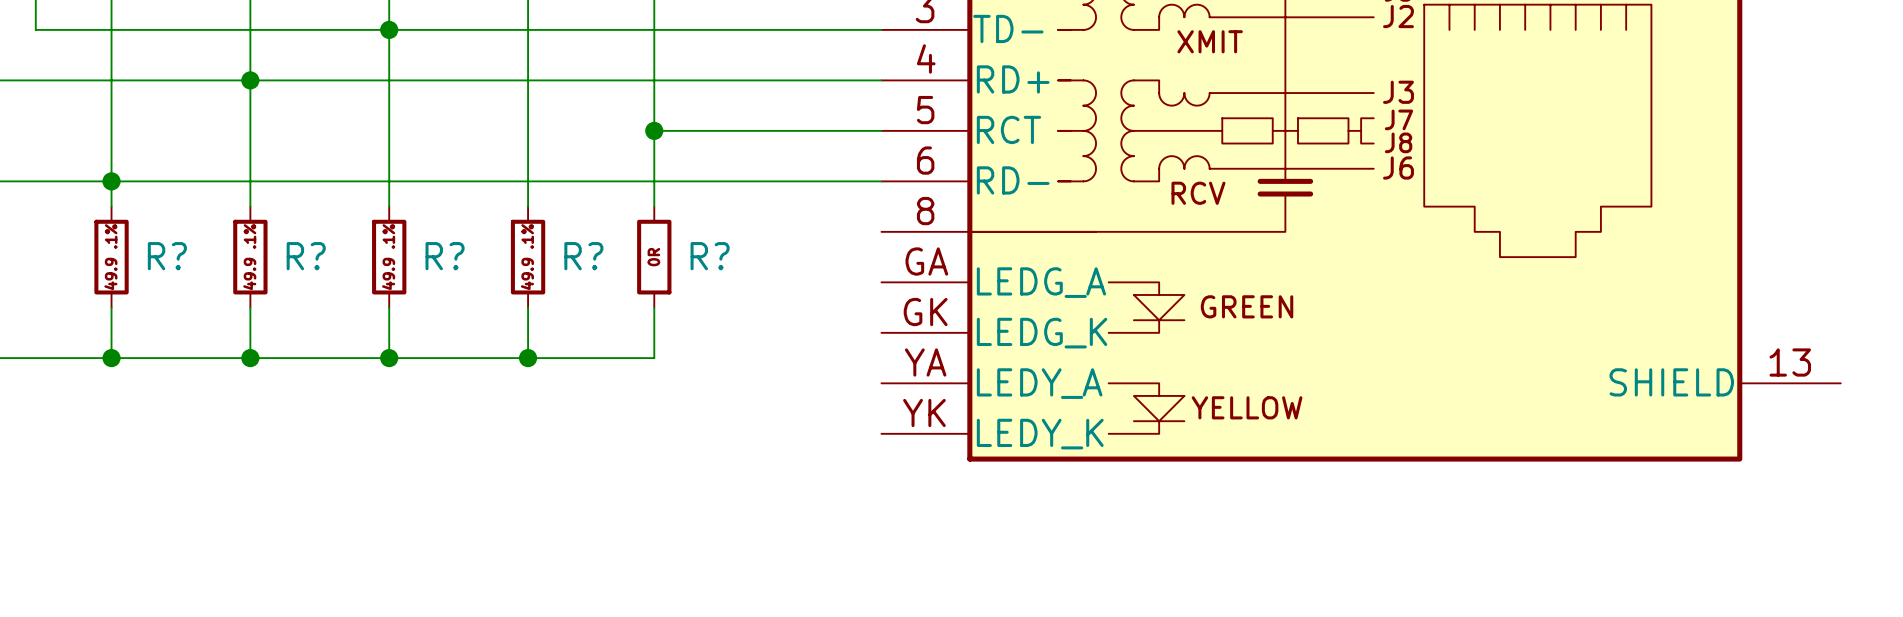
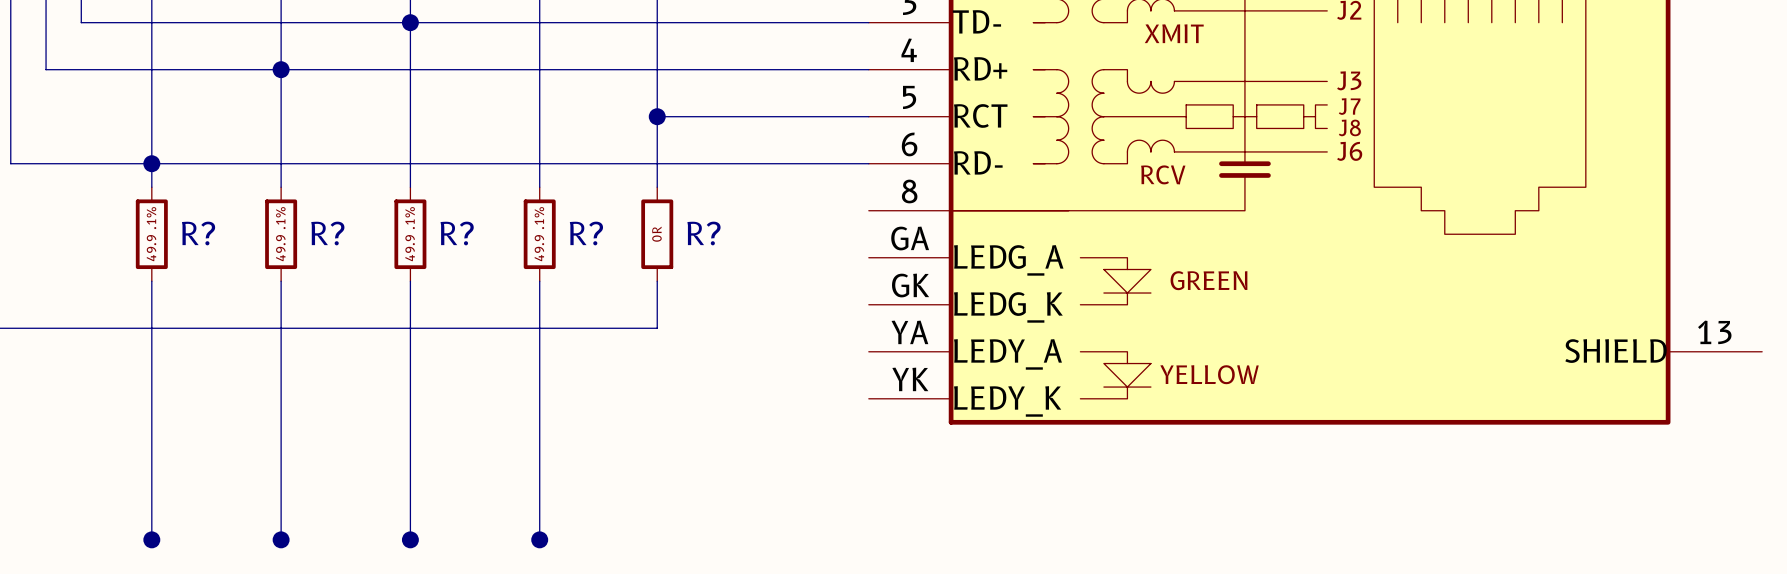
wire: none -> (151, 328) (151, 539)
junction: (111, 358) -> none
wire: none -> (281, 328) (281, 539)
junction: (250, 358) -> none
wire: none -> (410, 328) (410, 539)
junction: (389, 358) -> none
wire: none -> (539, 328) (539, 539)
junction: (528, 358) -> none
junction: none -> (151, 539)
junction: none -> (281, 539)
junction: none -> (410, 539)
junction: none -> (539, 539)

